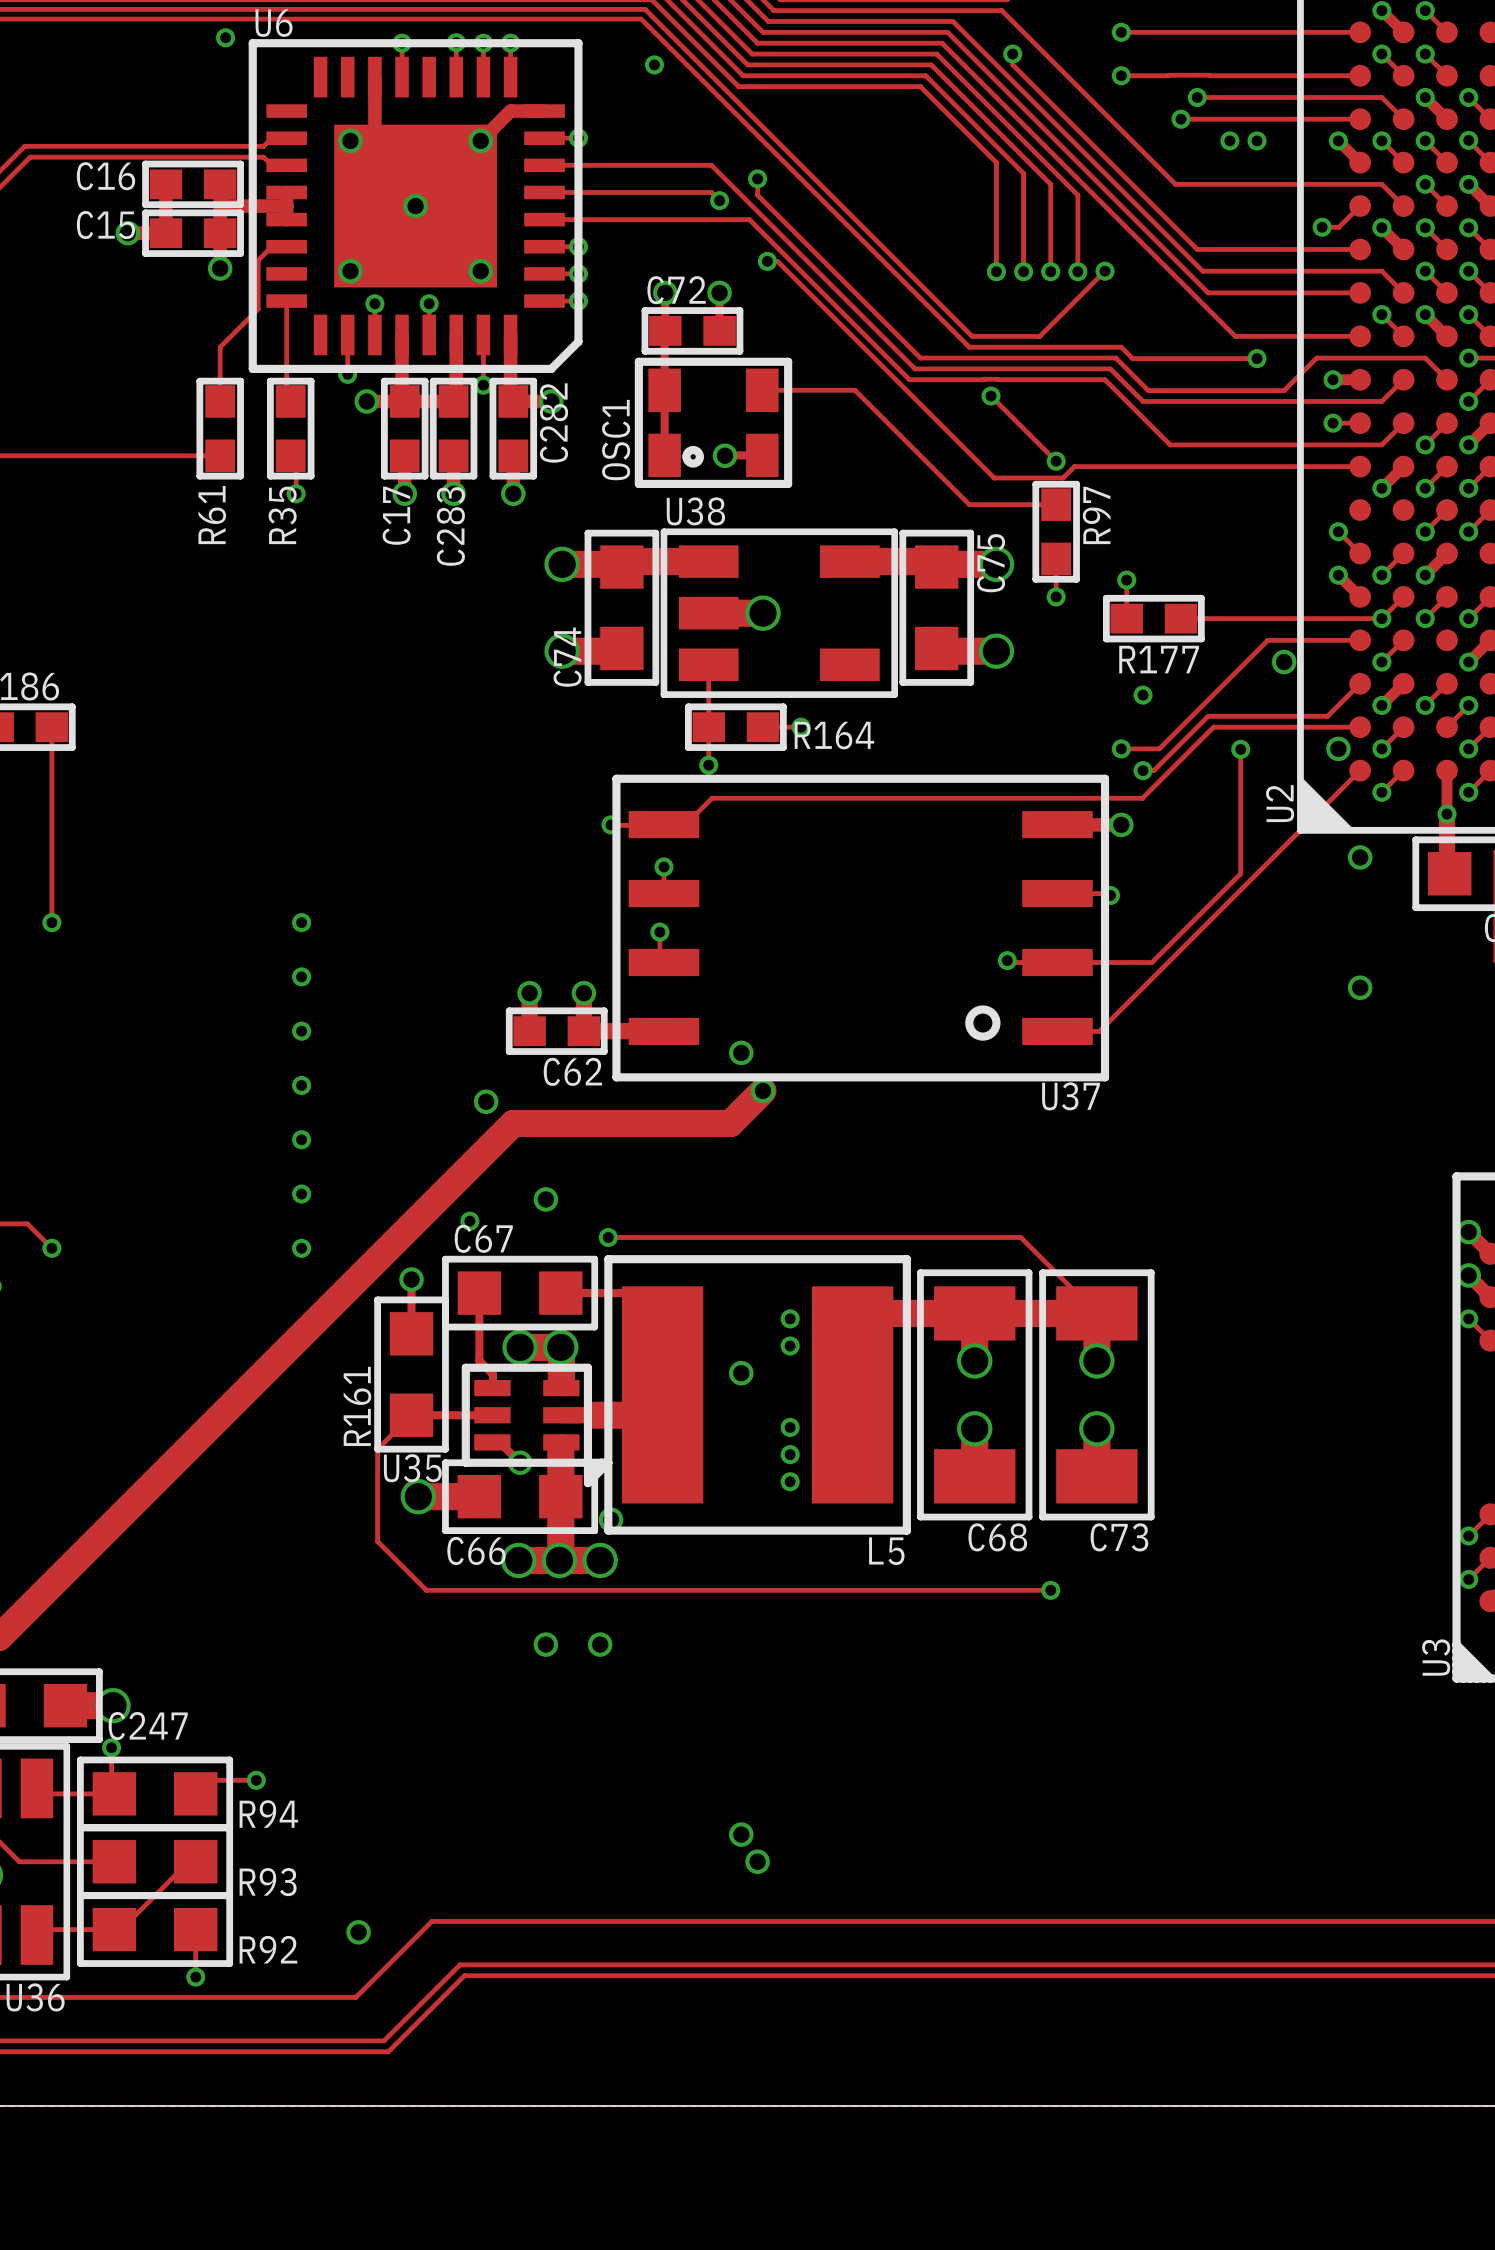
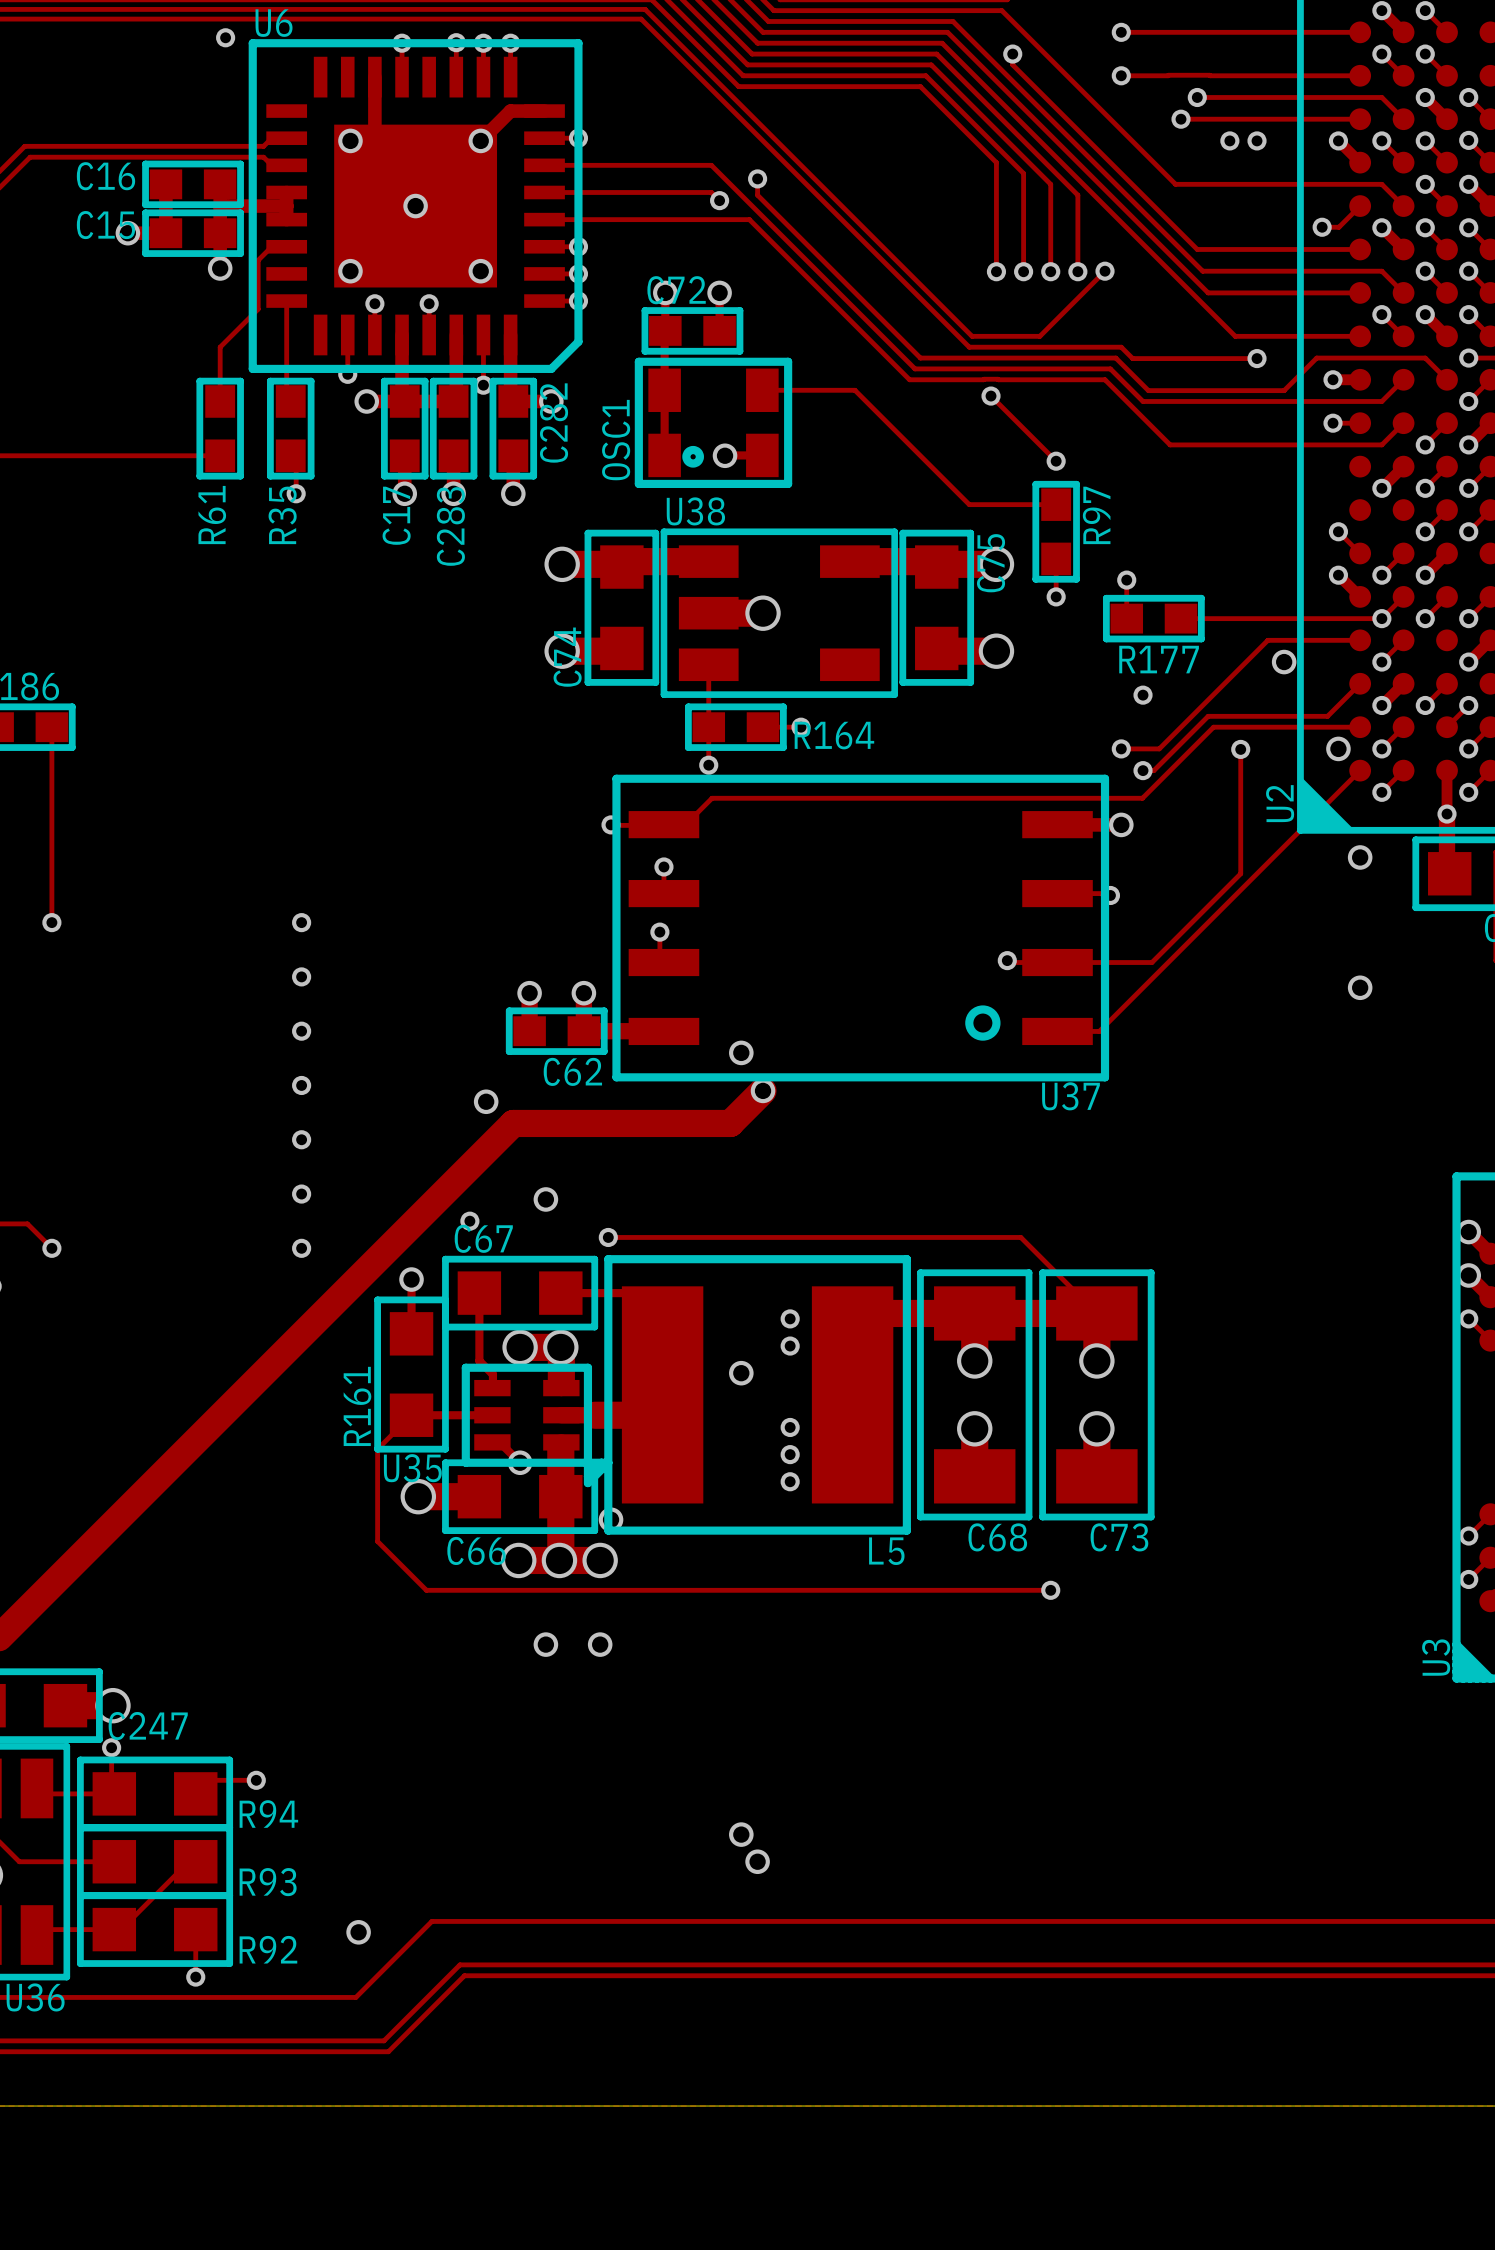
via: (654, 64) -> none
track: (767, 261) (777, 261) (994, 478) (1063, 478) (1074, 466) (1360, 466) -> none
via: (767, 261) -> none

